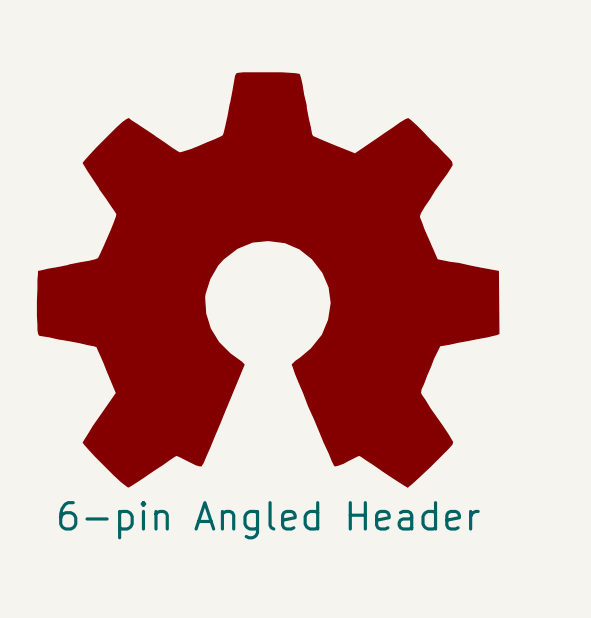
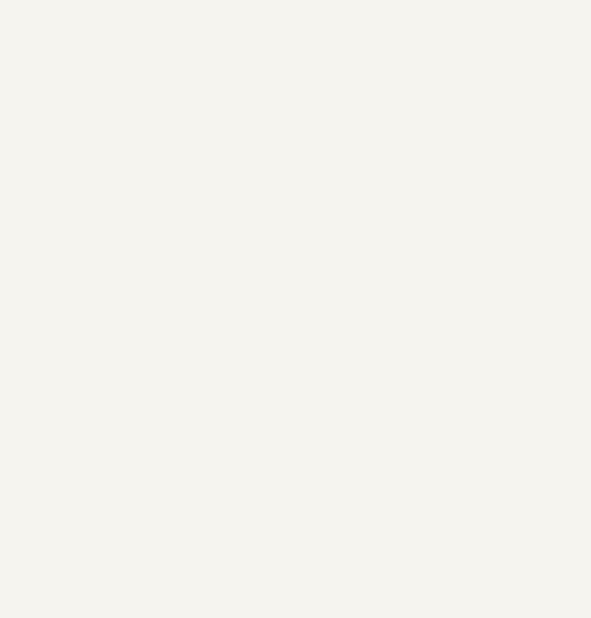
part: 6-pin Angled Header (268, 279) -> none

